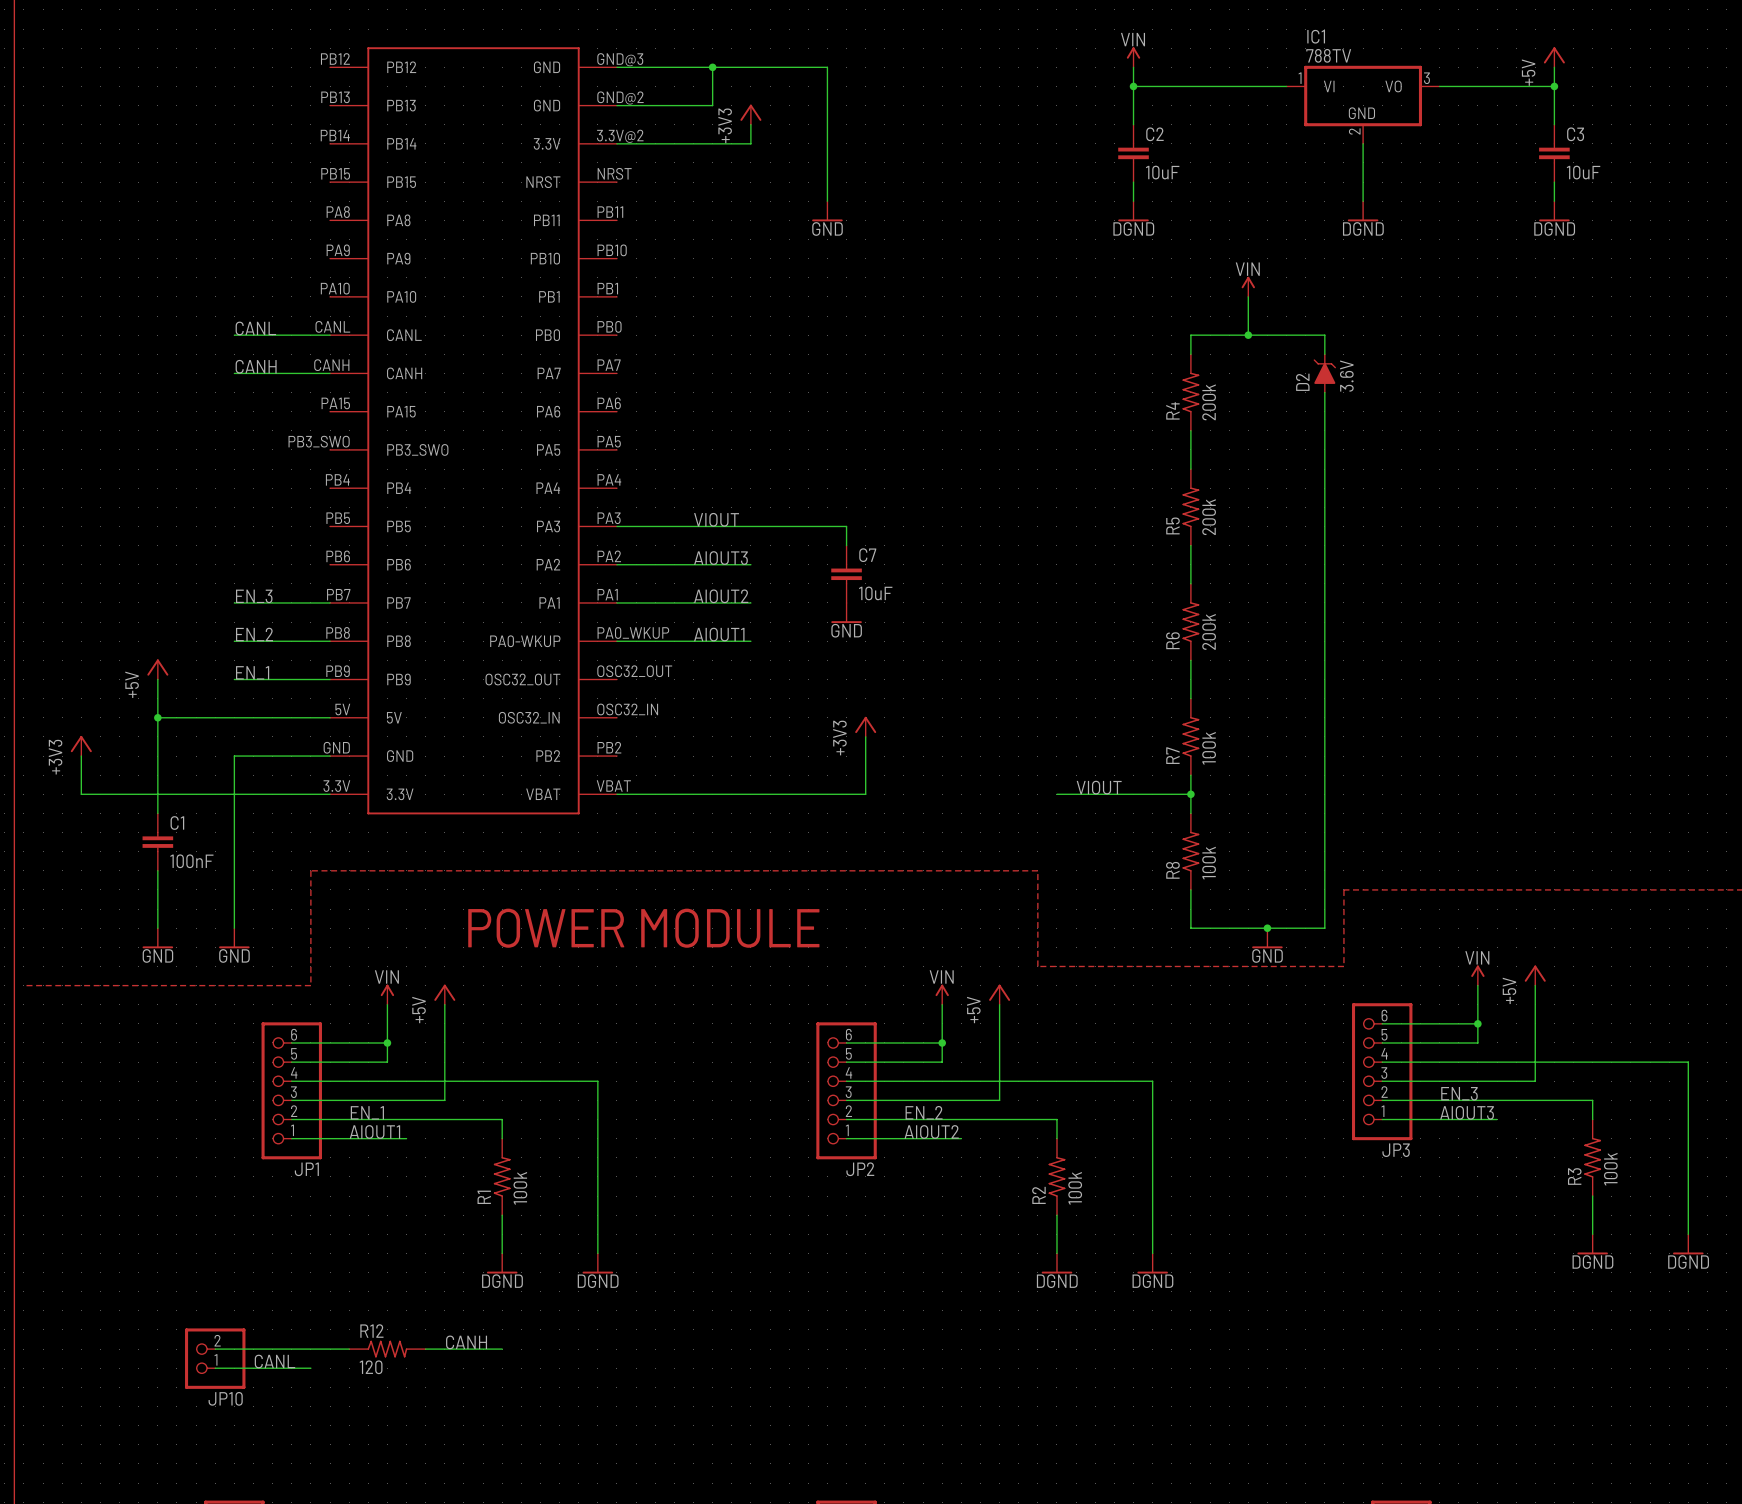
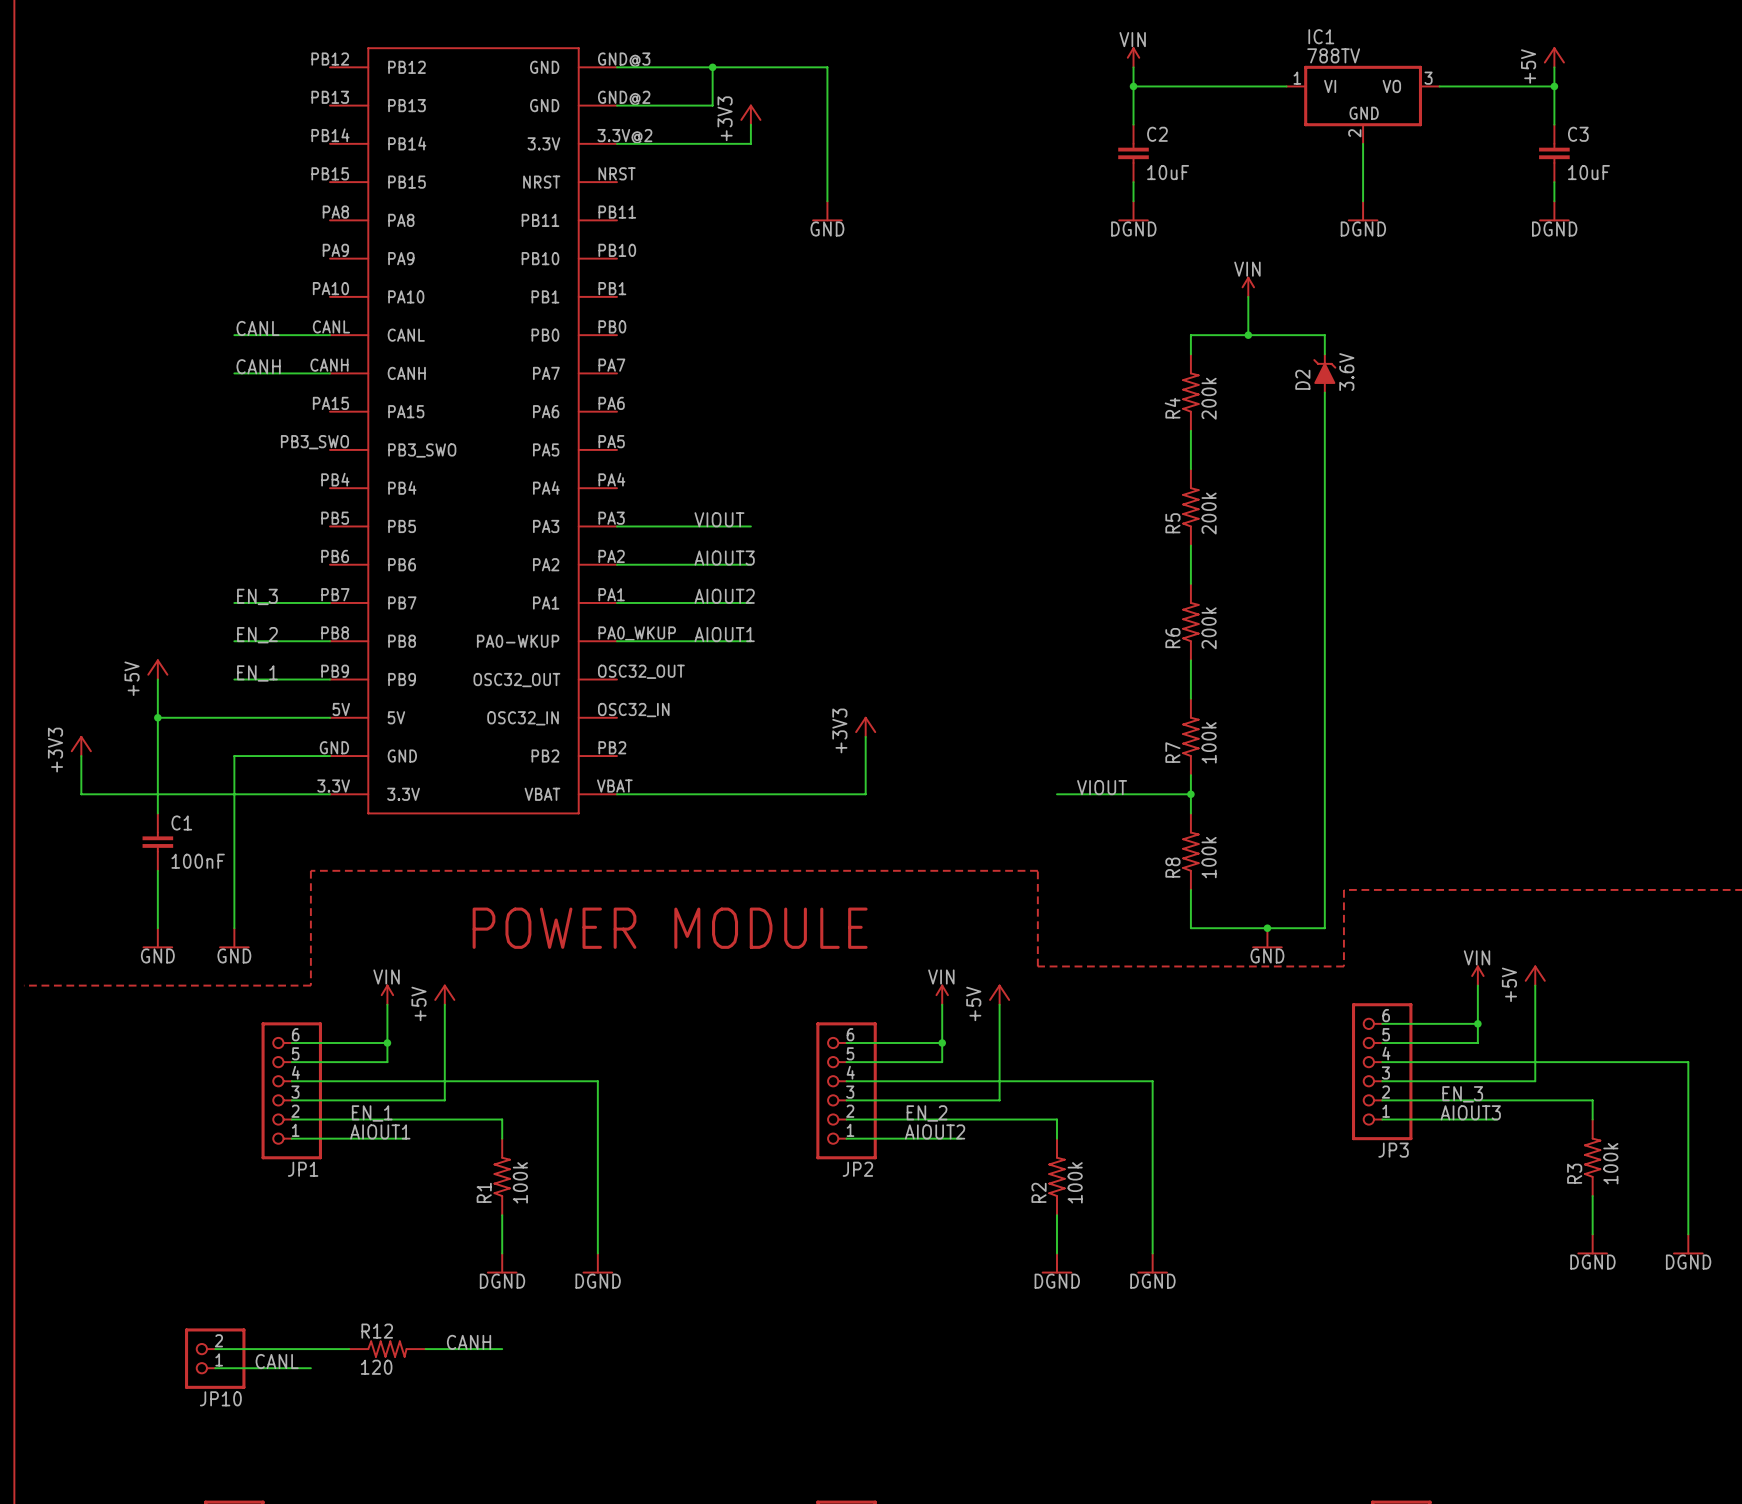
wire: (750, 526) (846, 526) (846, 545) -> none
C7: 10uF (846, 574) -> none
power symbol: GND (846, 613) -> none

